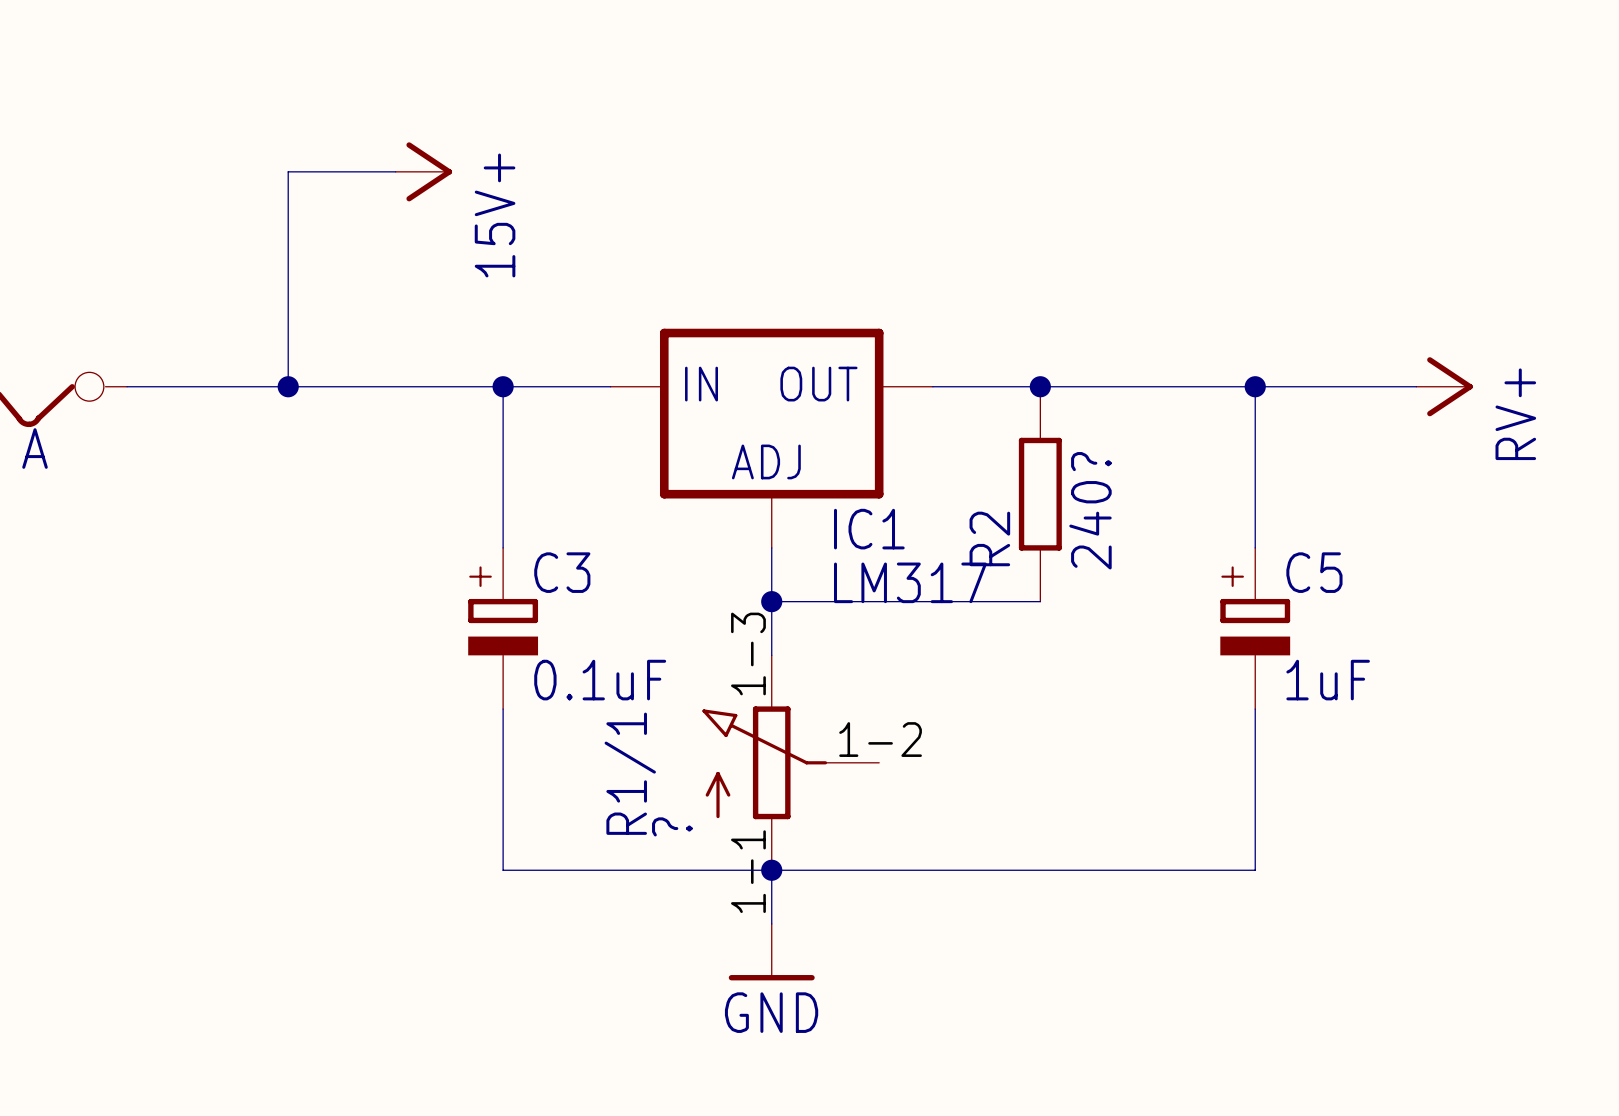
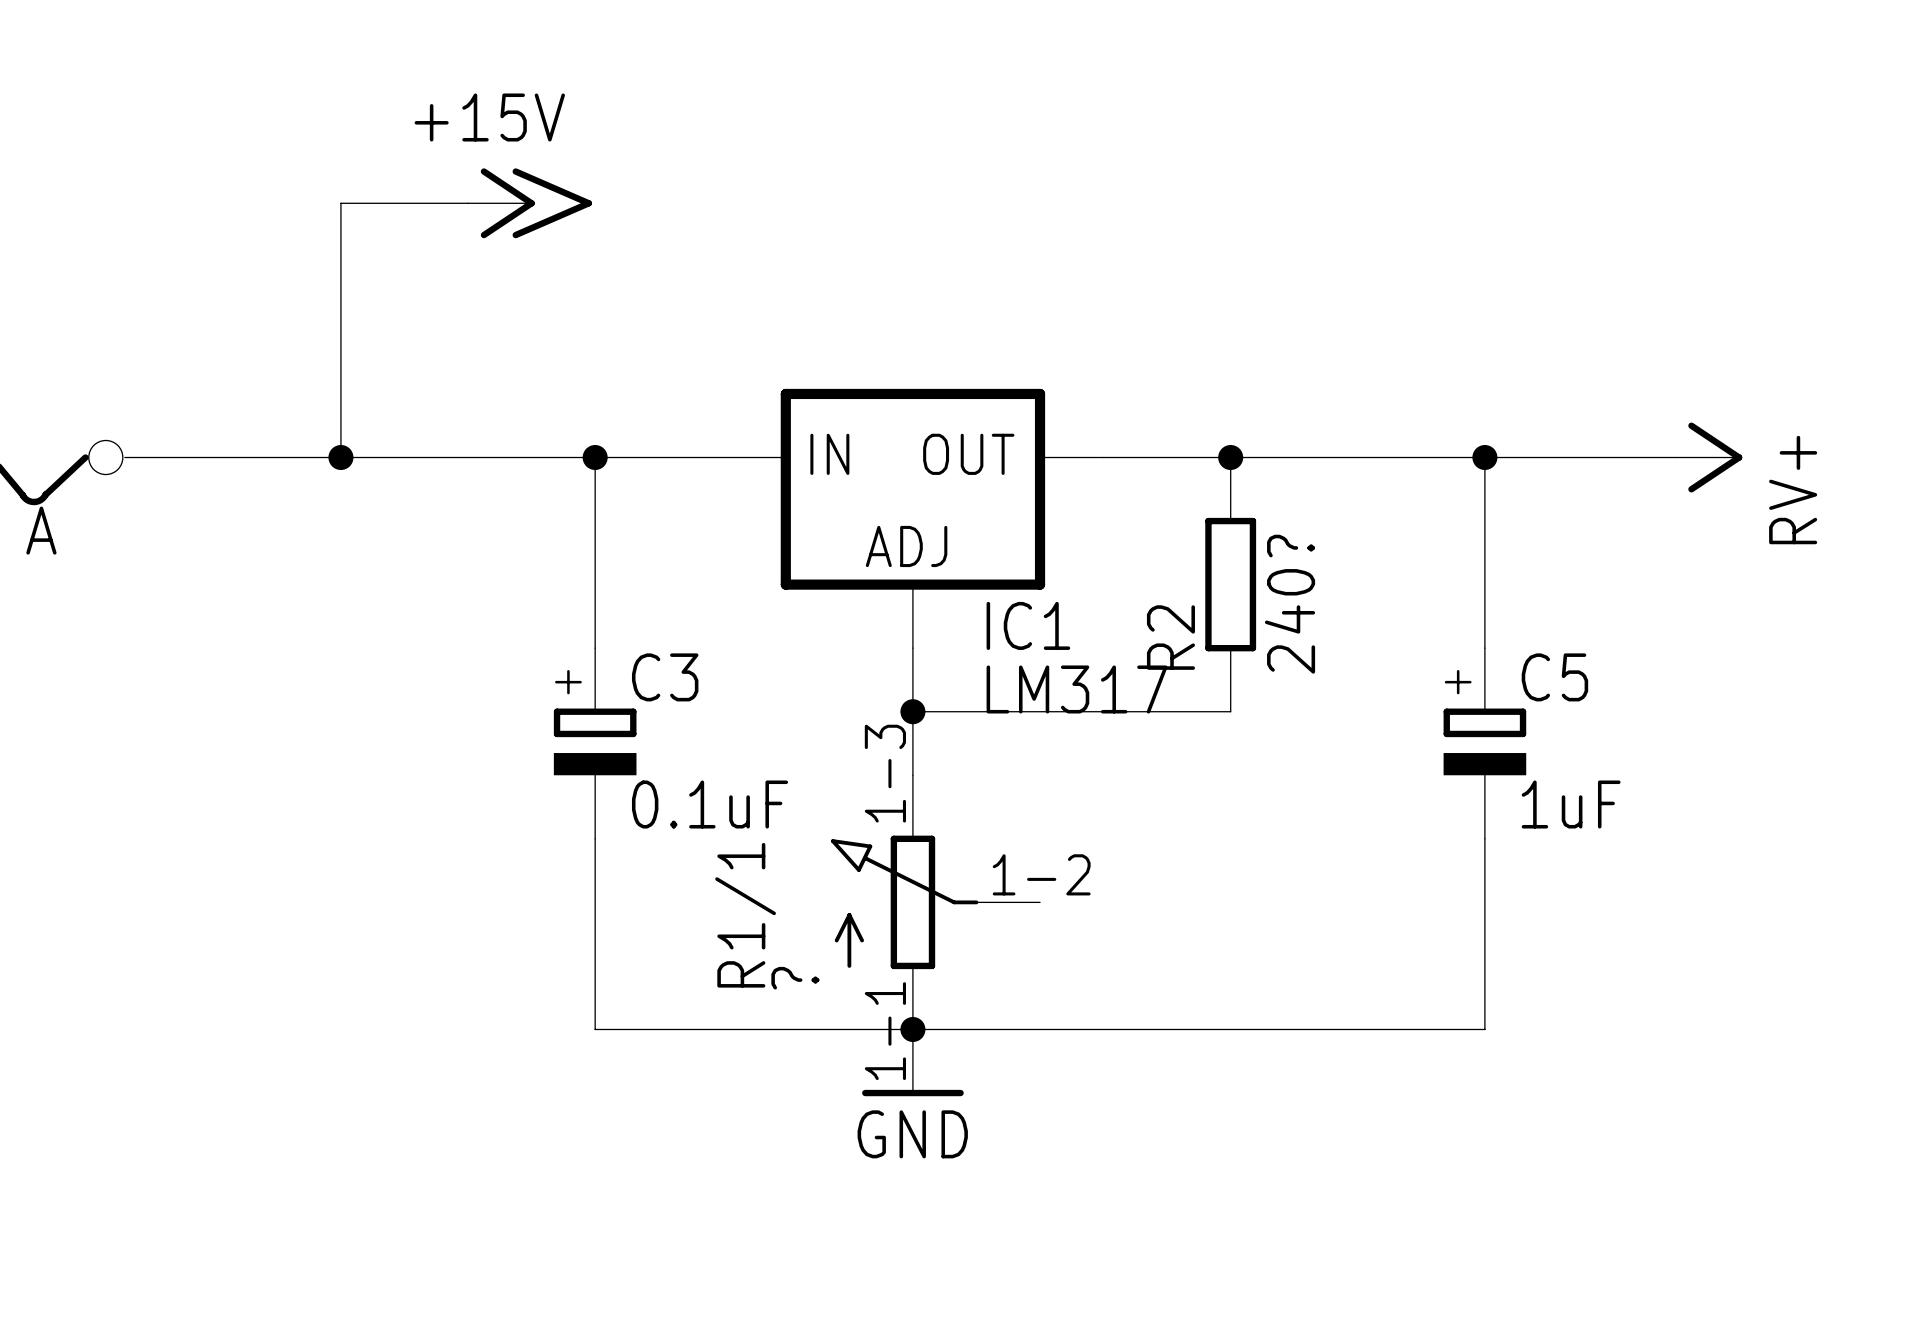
power symbol: 15V+ (423, 171) -> none
power symbol: none -> +15V (530, 203)
power symbol position: GND (771, 952) -> GND (912, 1062)

